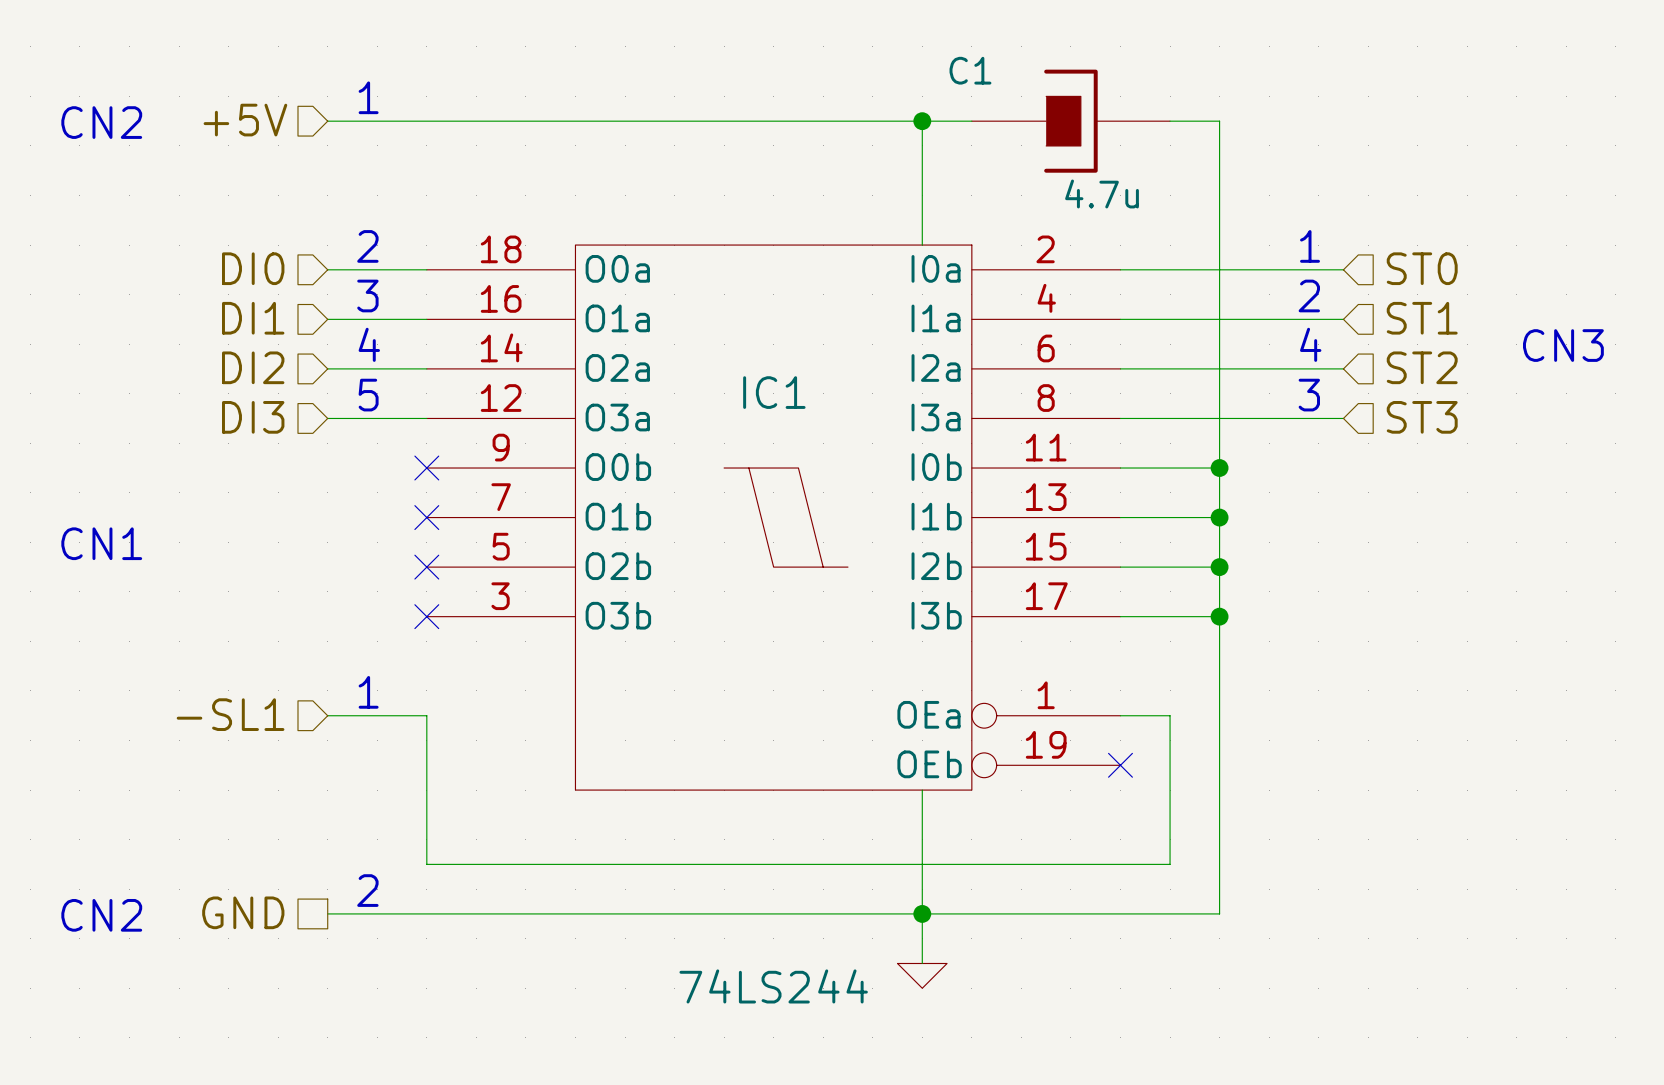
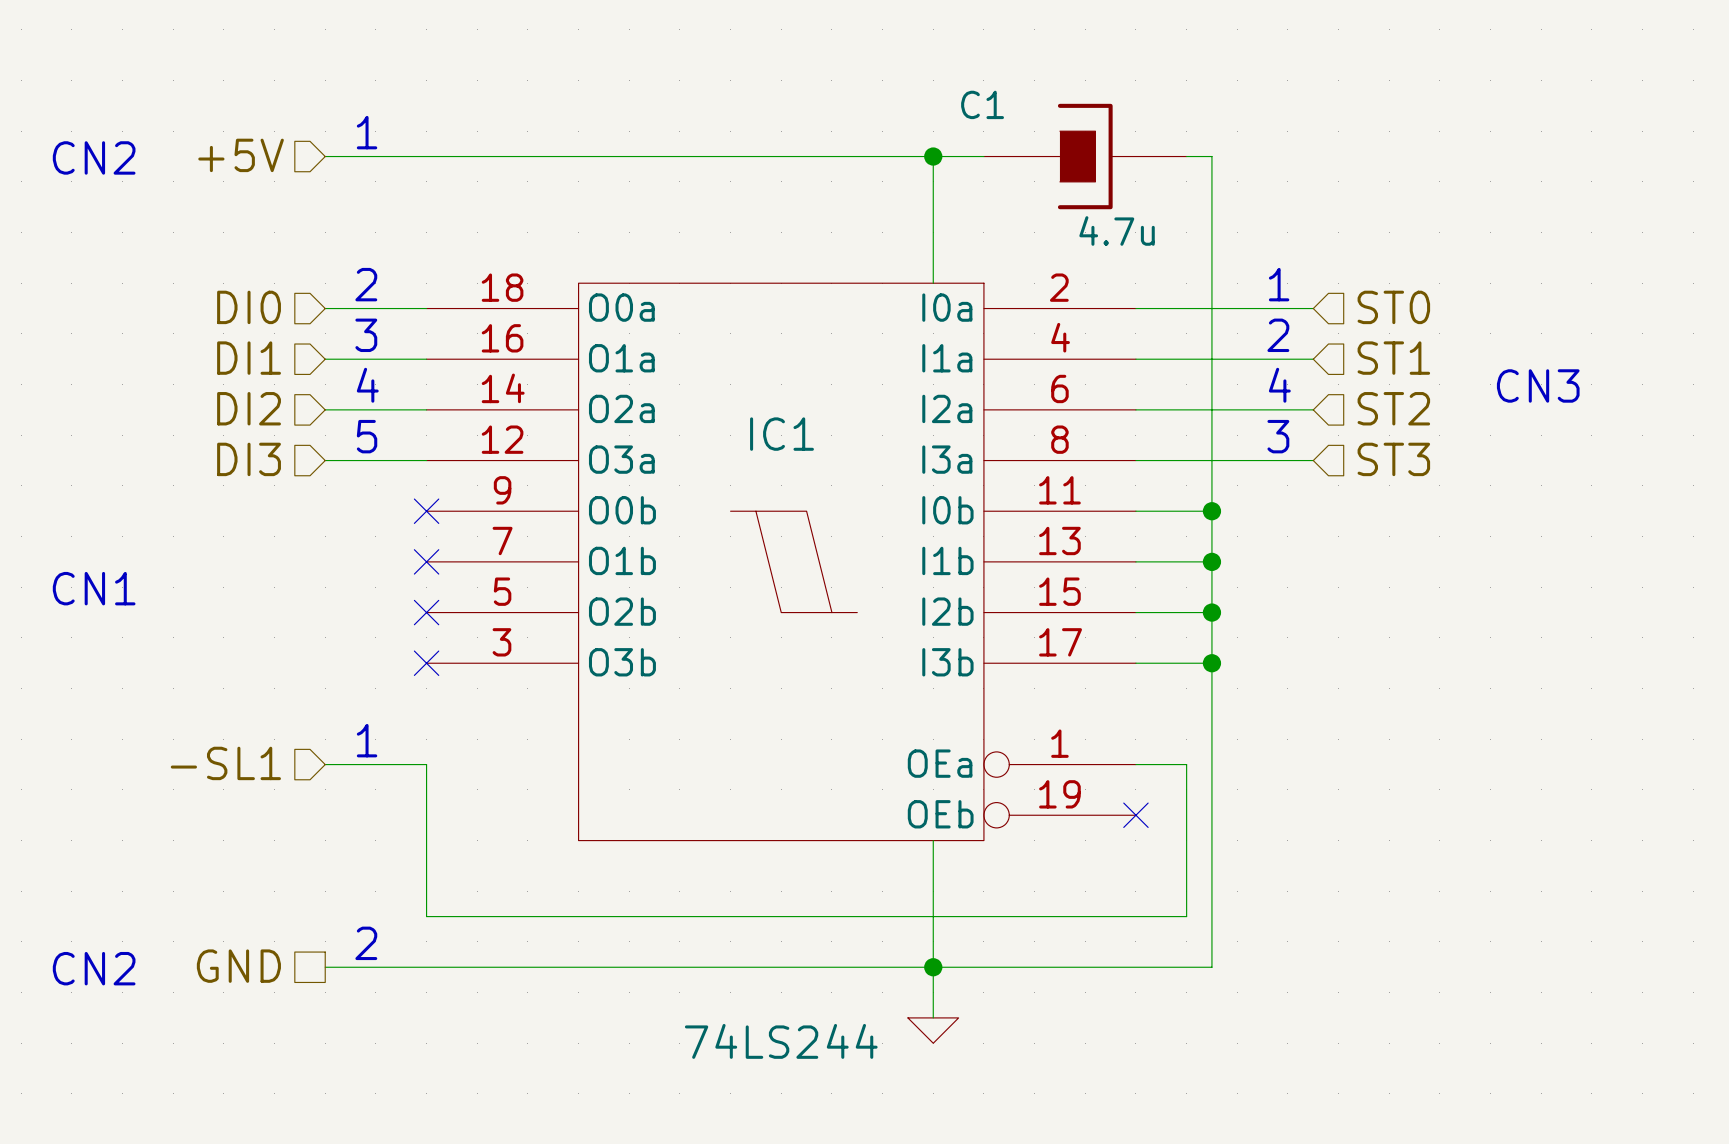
wire: (1194, 121) (1219, 121) (1219, 913) (1194, 913) -> (1211, 156) (1211, 967)
text position: 1 (1310, 246) -> 1 (1279, 284)
hierarchical label position: ST0 (1422, 268) -> ST0 (1393, 307)
wire: (1293, 269) (1343, 269) -> none
text position: 2 (1309, 295) -> 2 (1278, 335)
hierarchical label position: ST1 (1422, 318) -> ST1 (1393, 358)
wire: (1293, 319) (1343, 319) -> none
text position: 4 (1310, 344) -> 4 (1279, 385)
text position: CN3 (1563, 345) -> CN3 (1538, 385)
hierarchical label position: ST2 (1422, 367) -> ST2 (1393, 408)
wire: (1293, 368) (1343, 368) -> none
text position: 3 (1309, 395) -> 3 (1278, 436)
hierarchical label position: ST3 (1422, 417) -> ST3 (1393, 459)
wire: (1293, 418) (1343, 418) -> none
wire: (1194, 468) (1219, 468) -> none
junction position: (1219, 468) -> (1211, 511)
wire: (1194, 517) (1219, 517) -> none
junction position: (1219, 517) -> (1211, 561)
wire: (1194, 567) (1219, 567) -> none
junction position: (1219, 567) -> (1211, 612)
wire: (1194, 616) (1219, 616) -> none
junction position: (1219, 616) -> (1211, 663)

